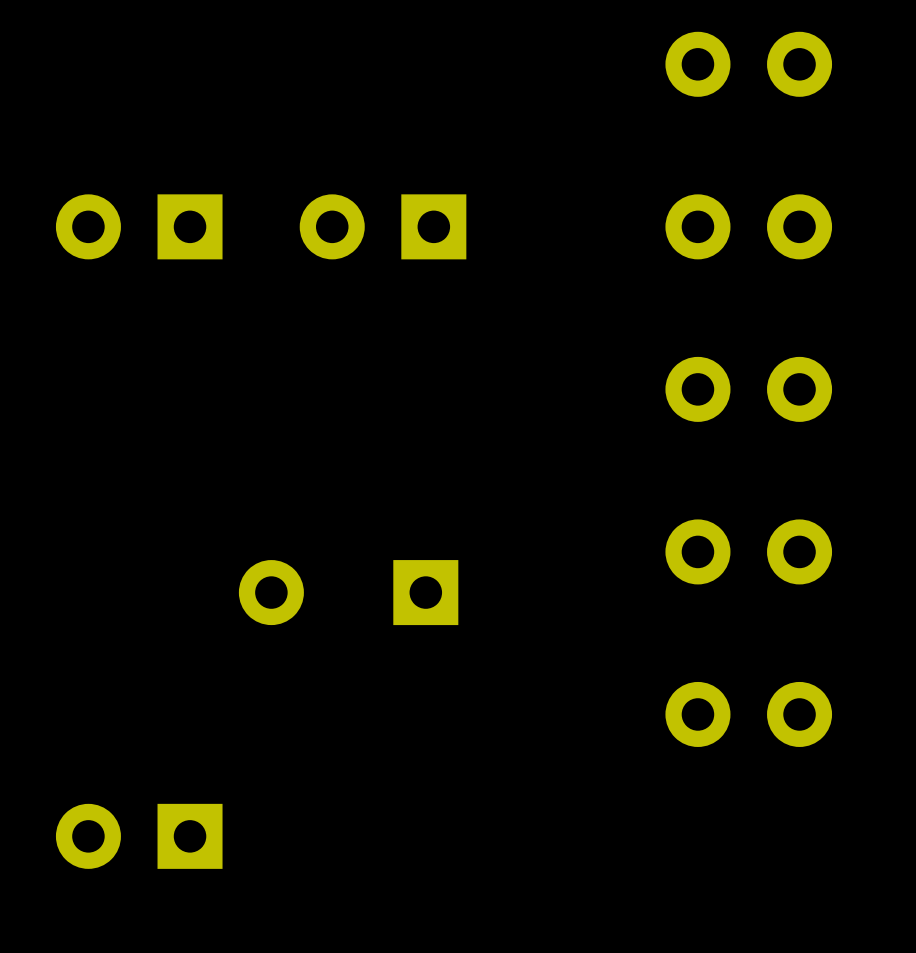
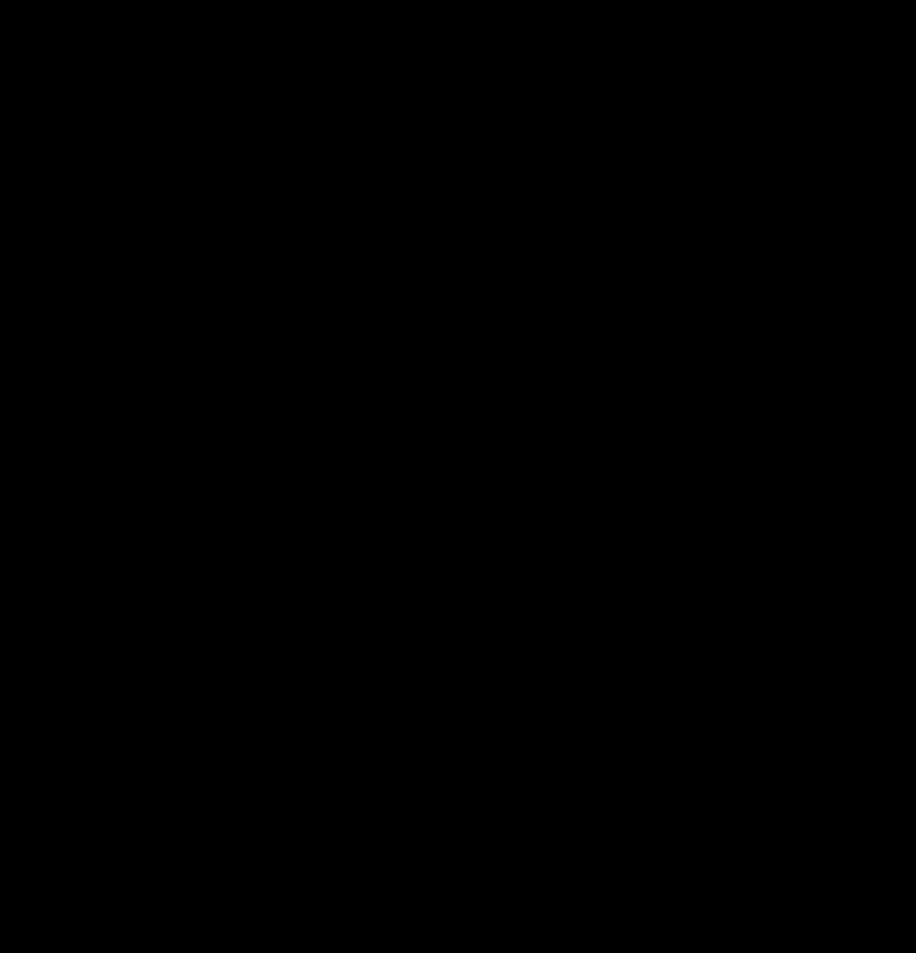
part: (748, 64) -> none
part: (139, 226) -> none
part: (383, 226) -> none
part: (748, 226) -> none
part: (748, 389) -> none
part: (748, 551) -> none
part: (348, 592) -> none
part: (748, 714) -> none
part: (139, 836) -> none

